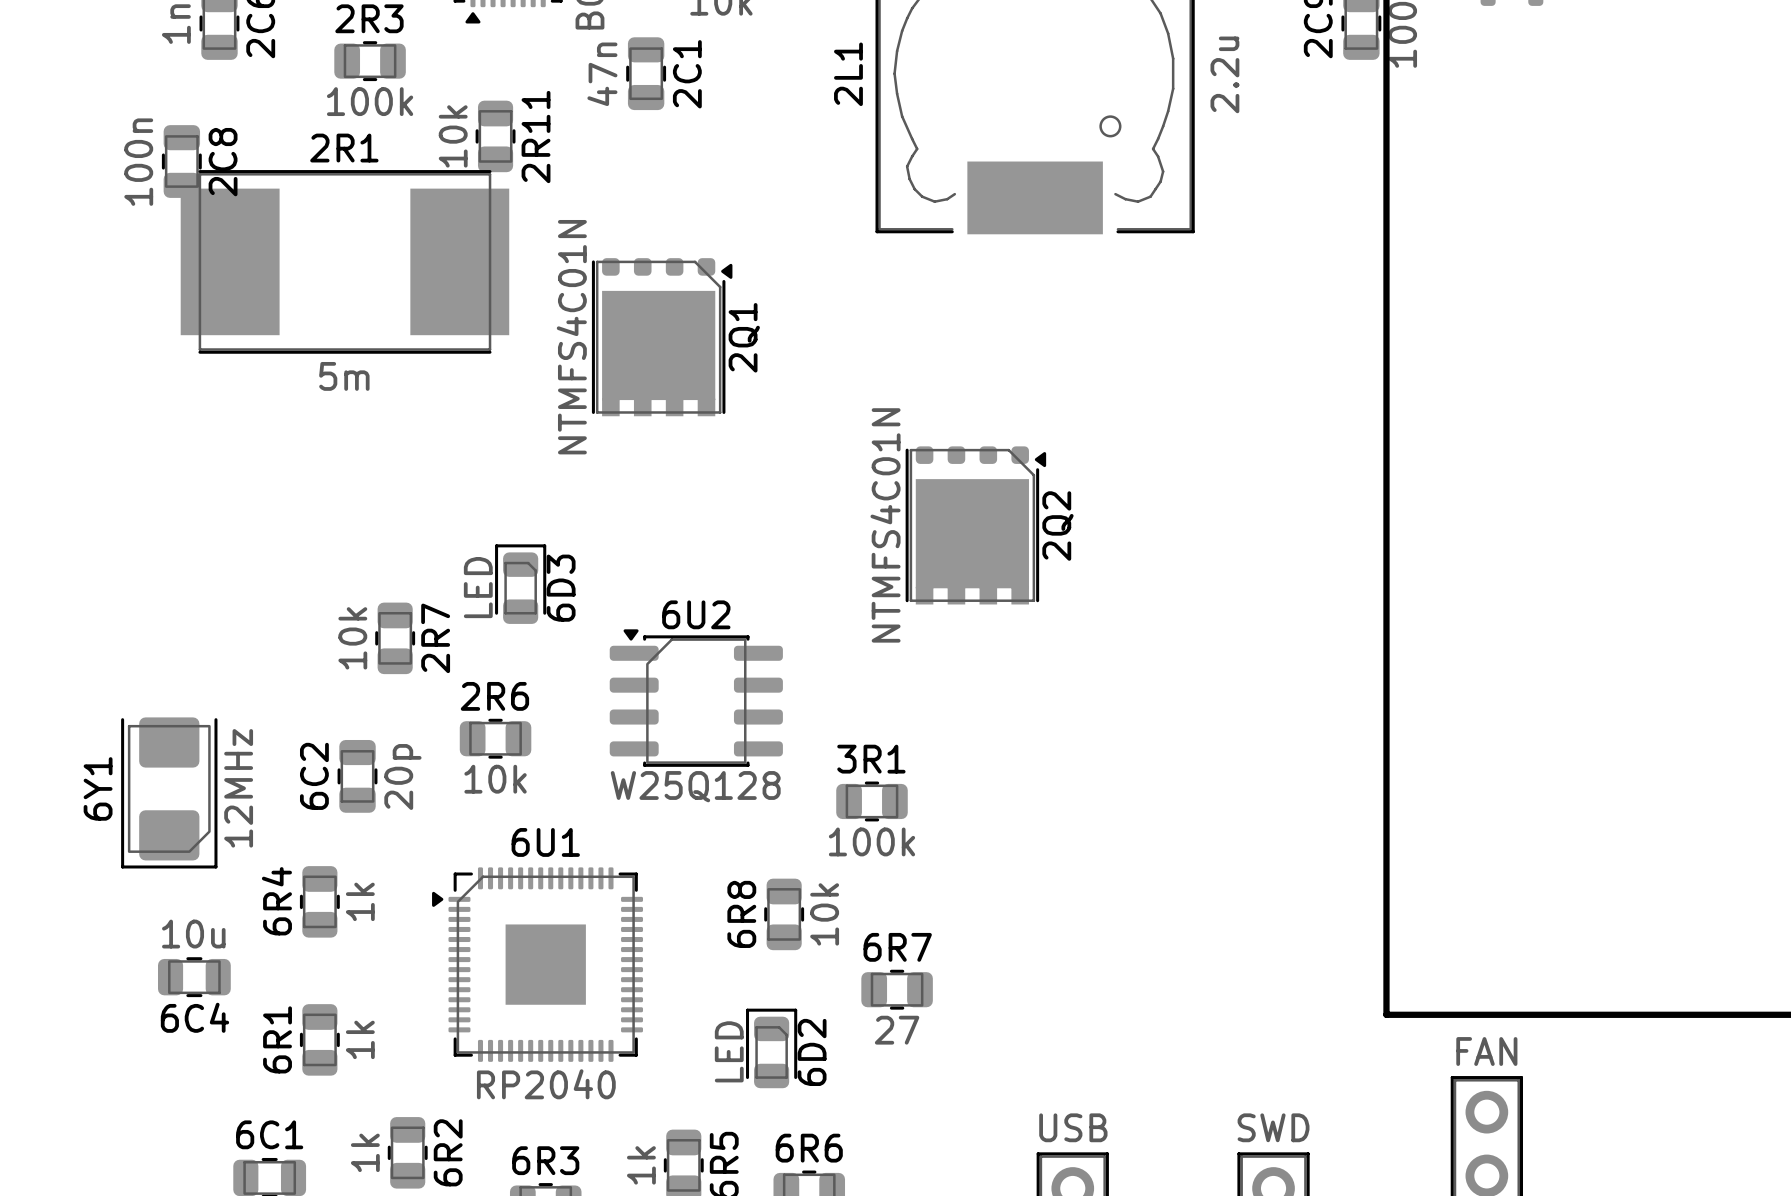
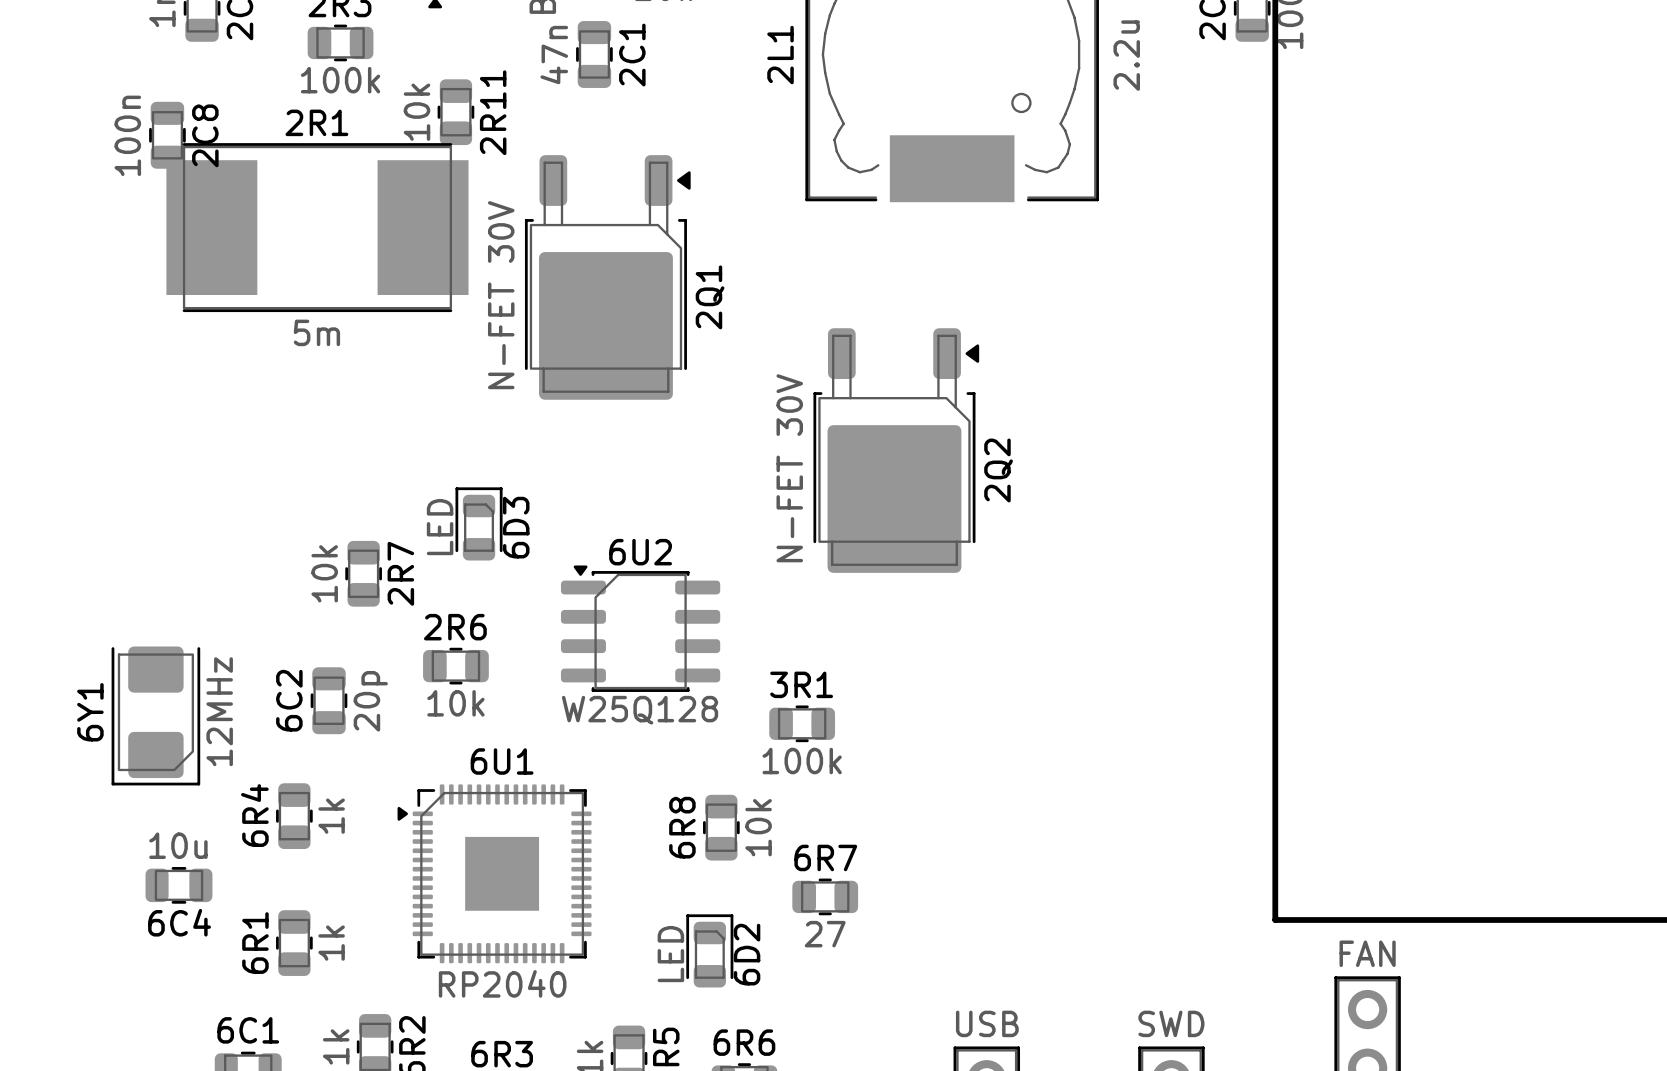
2Q1 footprint: [591, 258, 733, 417] -> [524, 155, 691, 400]
2Q1 value: NTMFS4C01N (571, 337) -> N-FET 30V (501, 295)
2Q2 footprint: [905, 446, 1047, 605] -> [813, 328, 980, 573]
2Q2 value: NTMFS4C01N (885, 525) -> N-FET 30V (789, 468)

